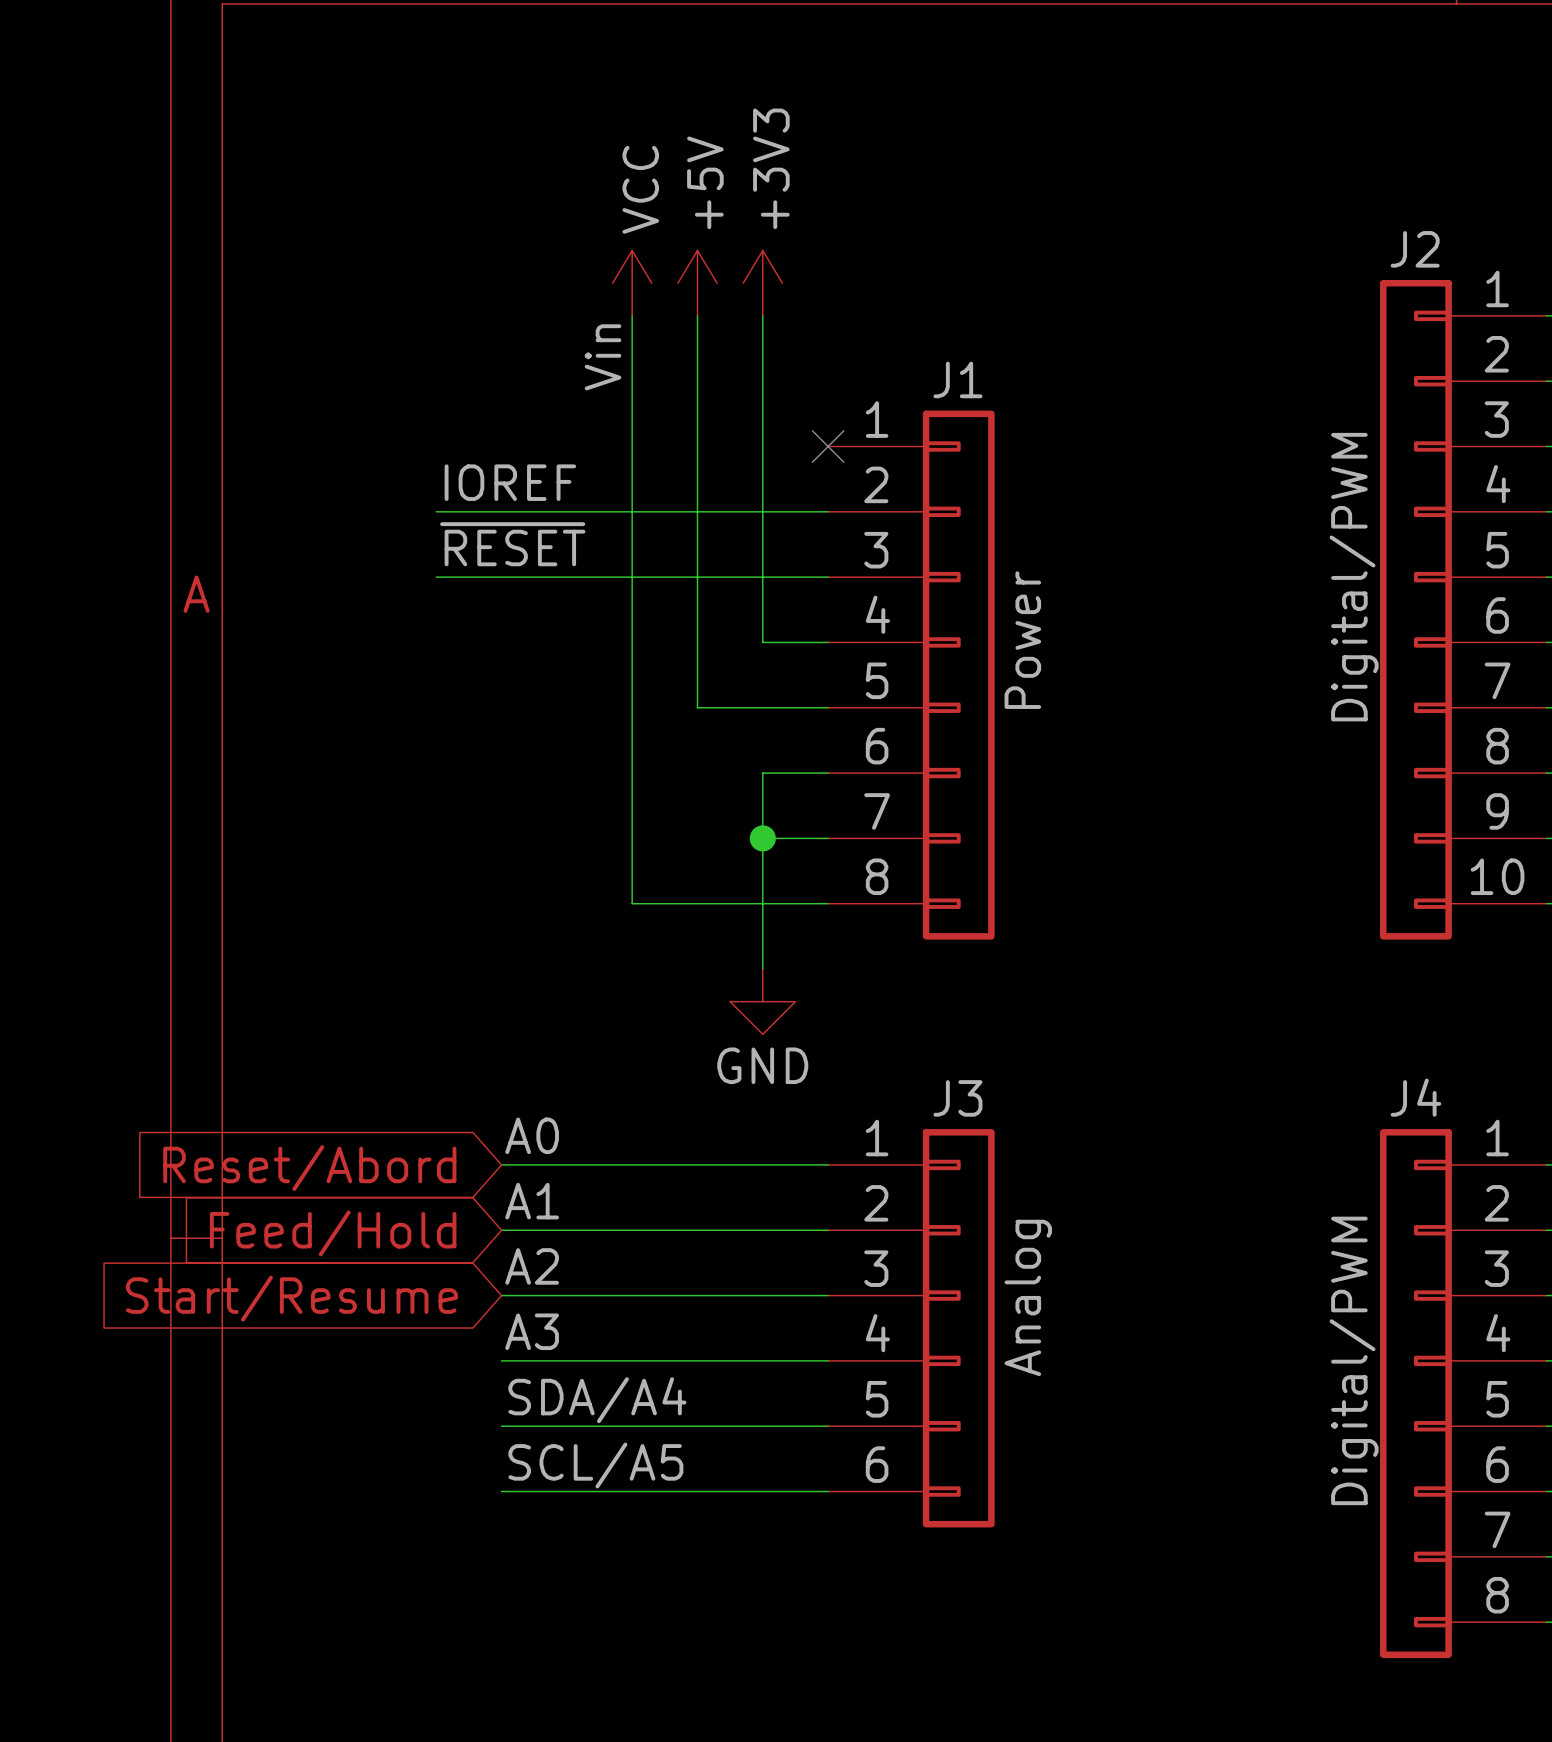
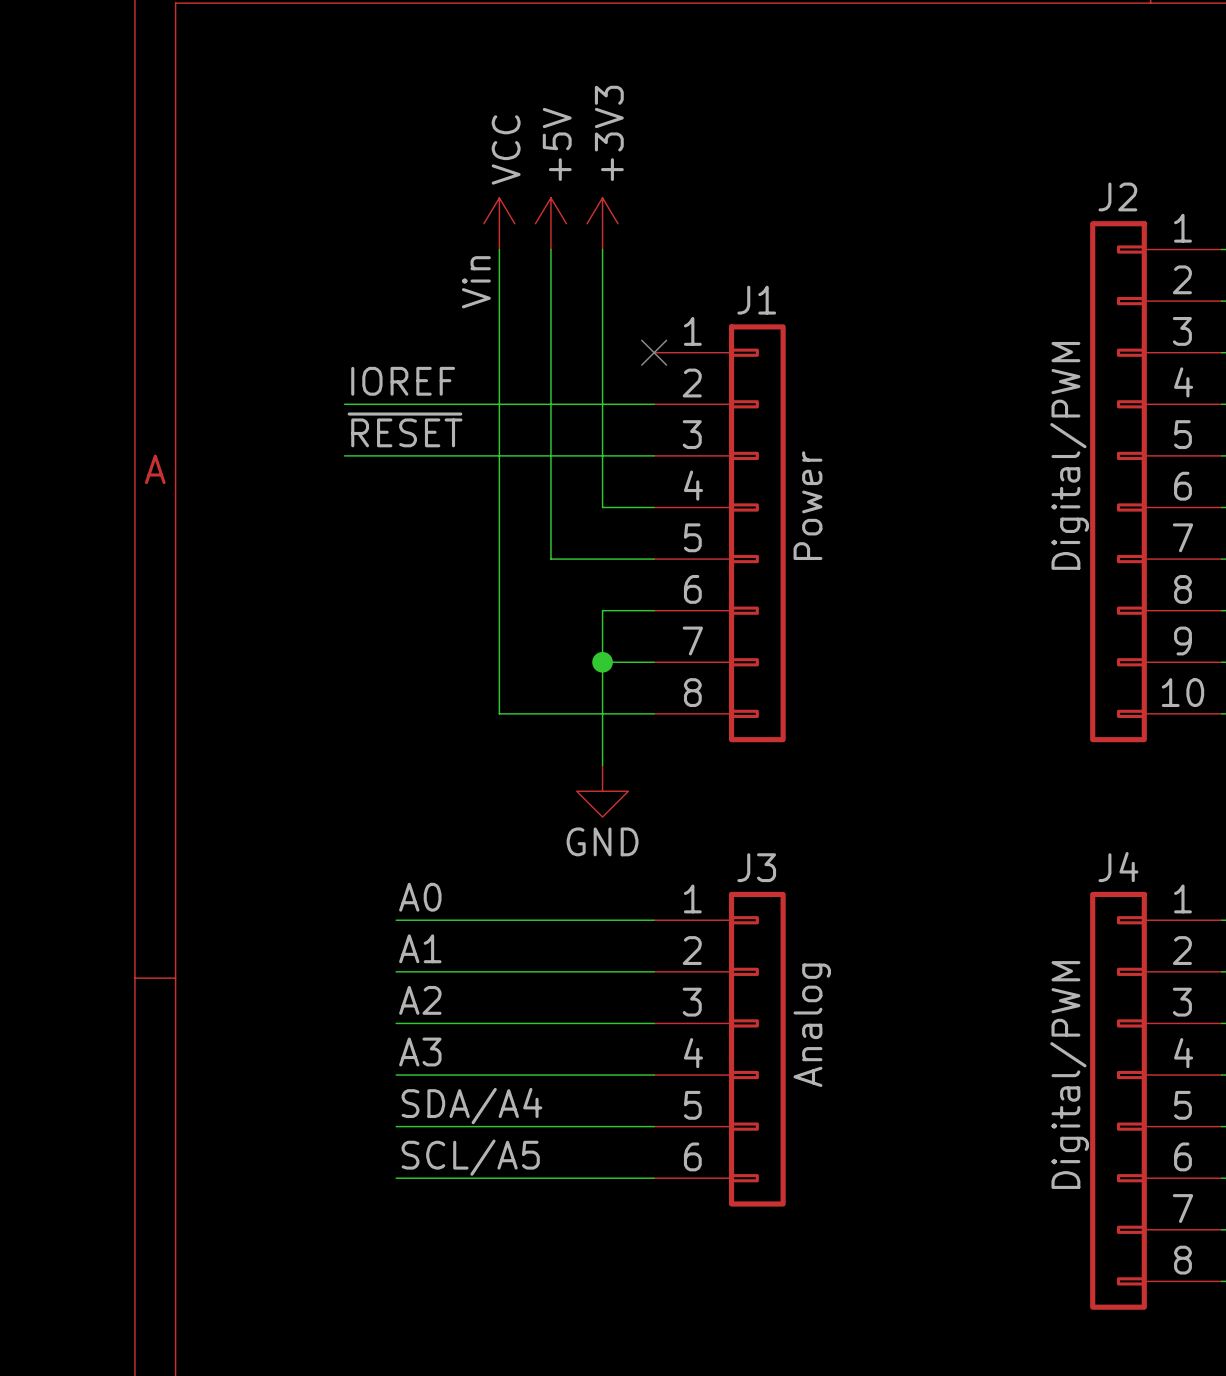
global label: Reset/Abord (309, 1168) -> none
global label: Feed/Hold (333, 1233) -> none
global label: Start/Resume (291, 1298) -> none

